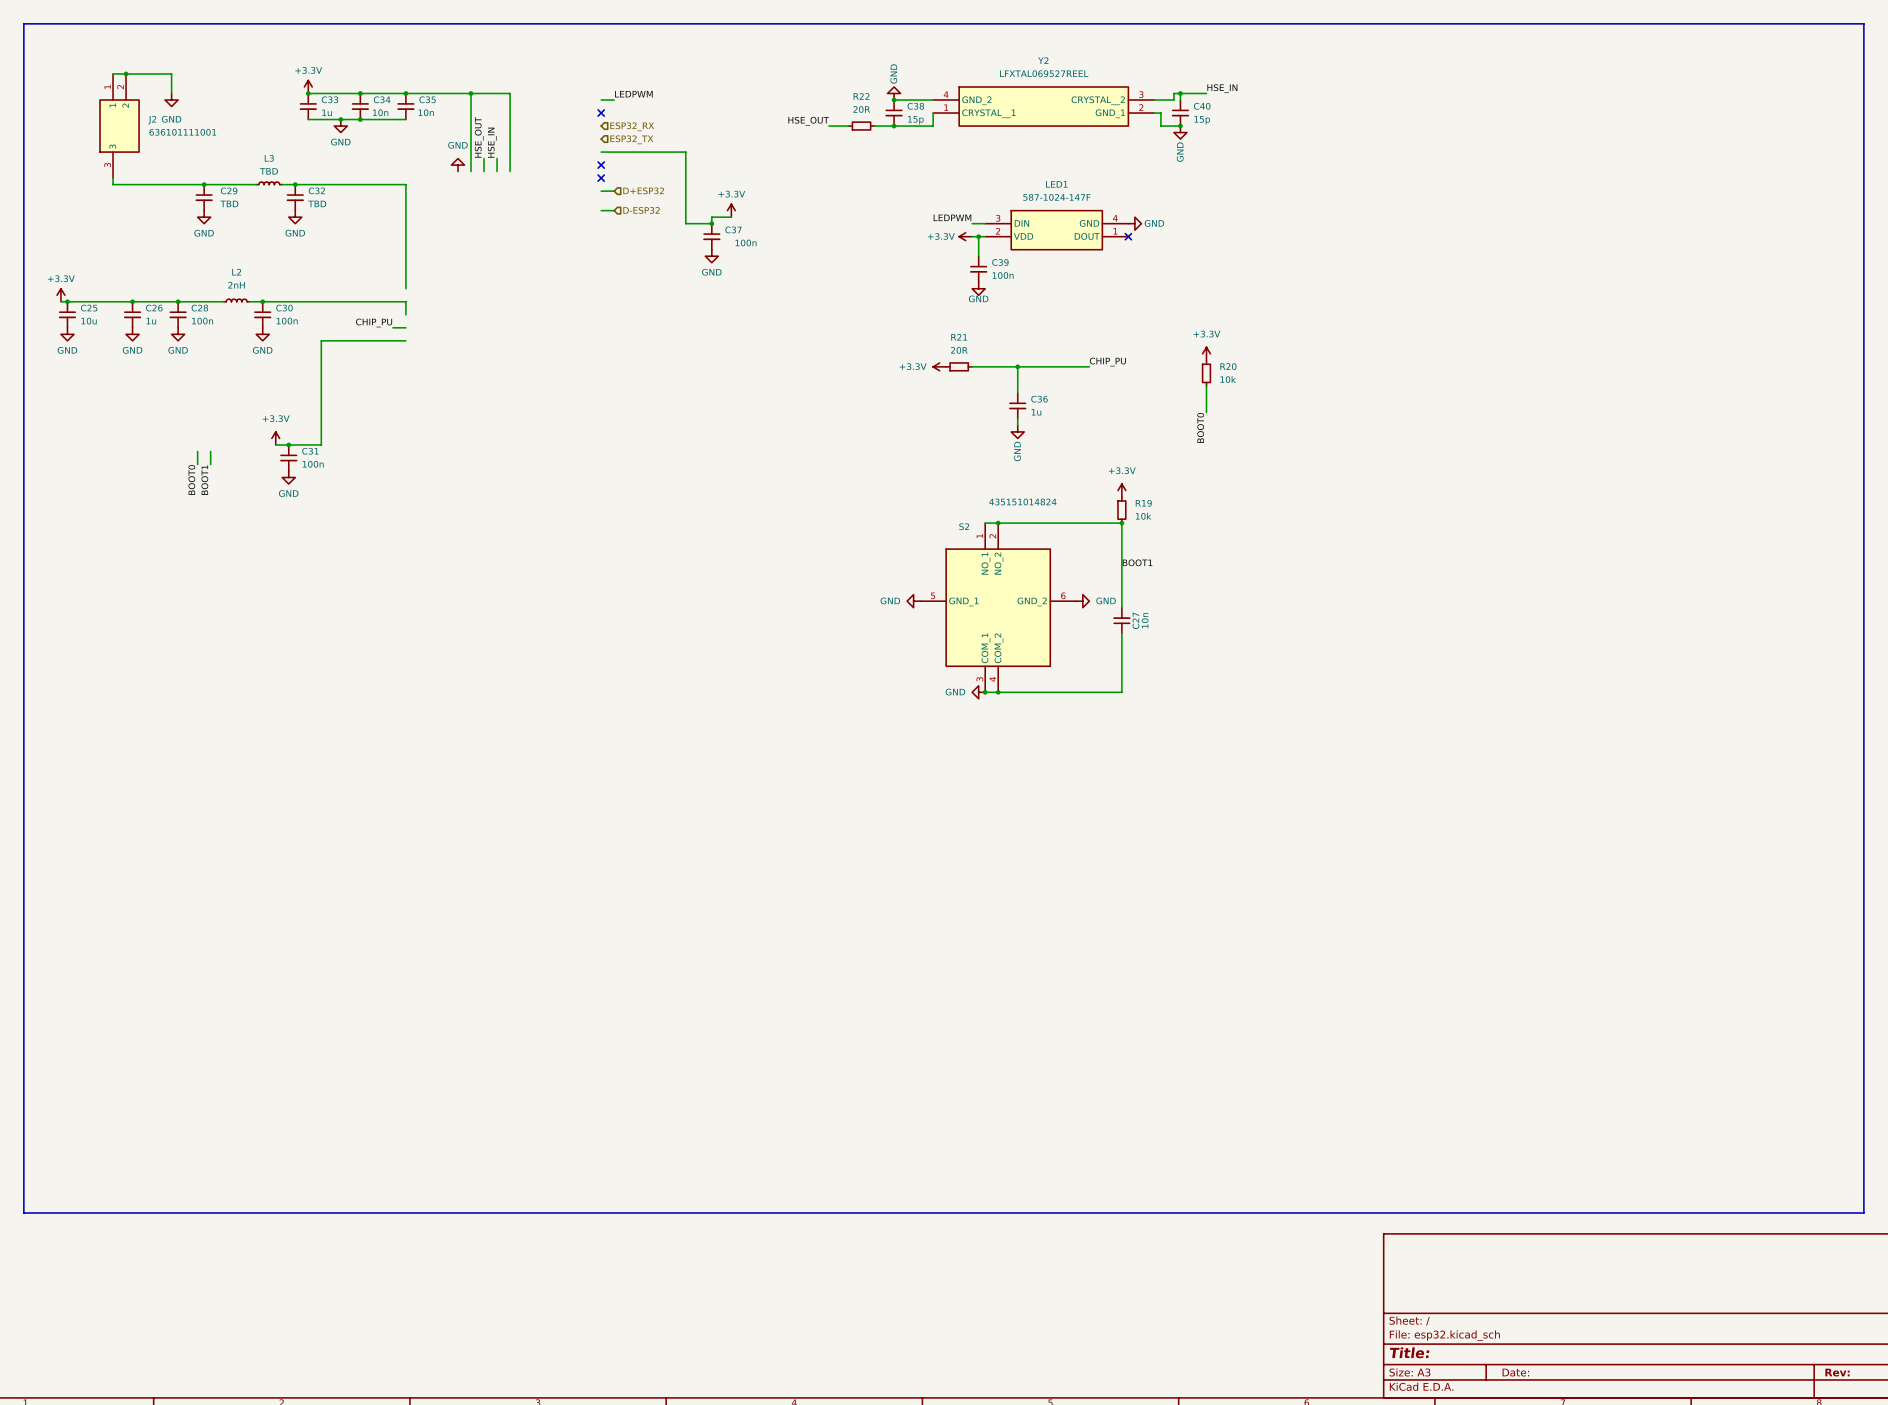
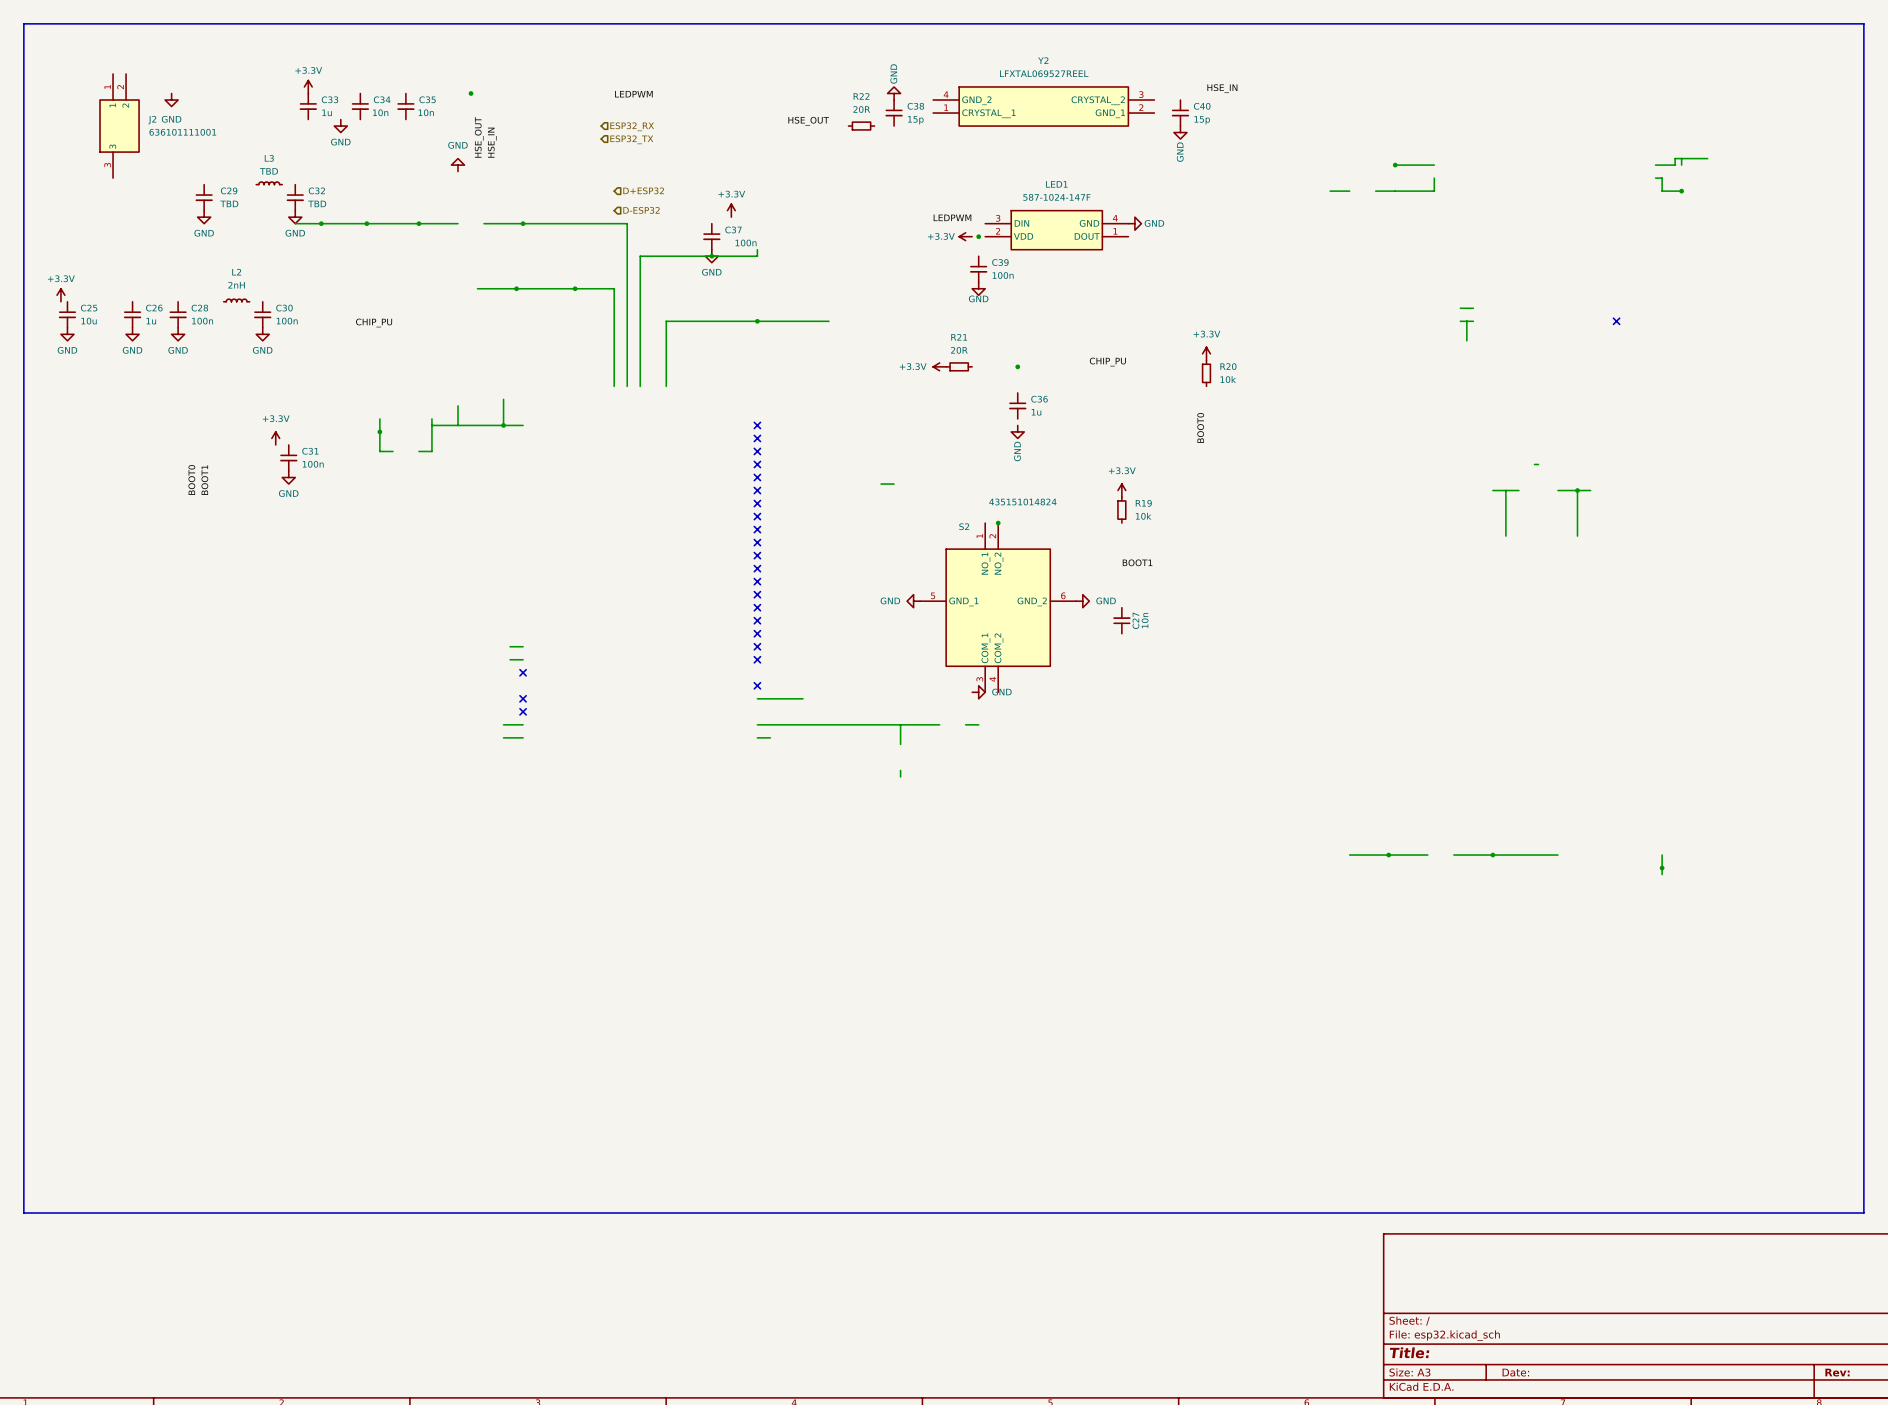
wire: (113, 73) (171, 73) (171, 93) -> none
junction: (126, 73) -> none
wire: (308, 93) (510, 93) (510, 171) -> none
junction: (308, 93) -> none
junction: (360, 93) -> none
junction: (405, 93) -> none
wire: (471, 93) (471, 171) -> none
wire: (1180, 93) (1180, 100) -> none
junction: (1180, 93) -> none
wire: (1206, 93) (1173, 93) (1173, 100) (1154, 100) -> none
wire: (601, 100) (614, 100) -> none
wire: (894, 100) (933, 100) -> none
junction: (894, 100) -> none
no-connect mark: (601, 113) -> none
wire: (933, 113) (933, 126) (874, 126) -> none
wire: (1154, 113) (1160, 113) (1160, 126) (1180, 126) -> none
wire: (308, 119) (405, 119) -> none
junction: (340, 119) -> none
junction: (360, 119) -> none
wire: (828, 126) (848, 126) -> none
junction: (894, 126) -> none
junction: (1180, 126) -> none
wire: (601, 152) (685, 152) (685, 223) (711, 223) (711, 217) (731, 217) -> none
wire: (484, 158) (484, 171) -> none
wire: (497, 158) (497, 171) -> none
wire: none -> (1681, 158) (1681, 165)
wire: none -> (1707, 158) (1675, 158) (1675, 165) (1655, 165)
no-connect mark: (601, 165) -> none
wire: none -> (1395, 165) (1434, 165)
junction: none -> (1395, 165)
wire: (113, 178) (113, 184) (256, 184) -> none
no-connect mark: (601, 178) -> none
wire: none -> (1434, 178) (1434, 191) (1375, 191)
wire: none -> (1655, 178) (1662, 178) (1662, 191) (1681, 191)
junction: (204, 184) -> none
wire: (282, 184) (405, 184) (405, 288) -> none
junction: (295, 184) -> none
wire: (601, 191) (614, 191) -> none
wire: none -> (1330, 191) (1349, 191)
junction: none -> (1681, 191)
wire: (601, 210) (614, 210) -> none
wire: none -> (295, 223) (457, 223)
junction: none -> (321, 223)
junction: none -> (366, 223)
junction: none -> (418, 223)
wire: none -> (484, 223) (627, 223) (627, 386)
junction: none -> (523, 223)
junction: (711, 223) -> none
wire: (972, 223) (985, 223) -> none
wire: (972, 236) (985, 236) -> none
wire: (978, 236) (978, 256) -> none
no-connect mark: (1128, 236) -> none
wire: none -> (757, 249) (757, 256) (640, 256) (640, 386)
junction: none -> (711, 256)
wire: none -> (477, 288) (614, 288) (614, 386)
junction: none -> (516, 288)
junction: none -> (575, 288)
wire: (60, 301) (223, 301) -> none
junction: (67, 301) -> none
junction: (132, 301) -> none
junction: (178, 301) -> none
wire: (249, 301) (405, 301) (405, 314) -> none
junction: (262, 301) -> none
wire: none -> (1460, 308) (1473, 308)
junction: none -> (757, 321)
wire: none -> (828, 321) (666, 321) (666, 386)
wire: none -> (1460, 321) (1473, 321)
wire: none -> (1466, 321) (1466, 340)
no-connect mark: none -> (1616, 321)
wire: (392, 327) (405, 327) -> none
wire: (405, 340) (321, 340) (321, 444) (275, 444) -> none
wire: (972, 366) (1089, 366) -> none
wire: (1017, 366) (1017, 392) -> none
wire: (1206, 386) (1206, 412) -> none
wire: none -> (503, 399) (503, 425)
wire: none -> (457, 405) (457, 425)
wire: none -> (379, 418) (379, 451) (392, 451)
wire: none -> (431, 418) (431, 451) (418, 451)
wire: (1017, 418) (1017, 425) -> none
wire: none -> (431, 425) (523, 425)
junction: none -> (503, 425)
no-connect mark: none -> (757, 425)
junction: none -> (379, 431)
no-connect mark: none -> (757, 438)
junction: (288, 444) -> none
wire: (197, 451) (197, 464) -> none
wire: (210, 451) (210, 464) -> none
no-connect mark: none -> (757, 451)
no-connect mark: none -> (757, 464)
wire: none -> (1534, 464) (1538, 464)
no-connect mark: none -> (757, 477)
wire: none -> (881, 484) (894, 484)
no-connect mark: none -> (757, 490)
wire: none -> (1492, 490) (1518, 490)
wire: none -> (1505, 490) (1505, 536)
wire: none -> (1557, 490) (1590, 490)
wire: none -> (1577, 490) (1577, 536)
junction: none -> (1577, 490)
no-connect mark: none -> (757, 503)
no-connect mark: none -> (757, 516)
wire: (985, 523) (1121, 523) (1121, 607) -> none
junction: (1121, 523) -> none
no-connect mark: none -> (757, 529)
no-connect mark: none -> (757, 542)
no-connect mark: none -> (757, 555)
no-connect mark: none -> (757, 568)
no-connect mark: none -> (757, 581)
no-connect mark: none -> (757, 594)
no-connect mark: none -> (757, 607)
no-connect mark: none -> (757, 620)
no-connect mark: none -> (757, 633)
wire: (1121, 633) (1121, 692) (985, 692) -> none
wire: none -> (510, 646) (523, 646)
no-connect mark: none -> (757, 646)
wire: none -> (510, 659) (523, 659)
no-connect mark: none -> (757, 659)
no-connect mark: none -> (523, 672)
no-connect mark: none -> (757, 685)
power symbol rotation: 0° (978, 692) -> 180° (978, 692)
junction: (985, 692) -> none
junction: (998, 692) -> none
no-connect mark: none -> (523, 698)
wire: none -> (757, 698) (802, 698)
no-connect mark: none -> (523, 711)
wire: none -> (503, 724) (523, 724)
wire: none -> (757, 724) (939, 724)
wire: none -> (900, 724) (900, 744)
wire: none -> (965, 724) (978, 724)
wire: none -> (503, 737) (523, 737)
wire: none -> (757, 737) (770, 737)
wire: none -> (900, 770) (900, 776)
wire: none -> (1349, 855) (1427, 855)
junction: none -> (1388, 855)
wire: none -> (1453, 855) (1557, 855)
junction: none -> (1492, 855)
wire: none -> (1662, 855) (1662, 874)
junction: none -> (1662, 868)

